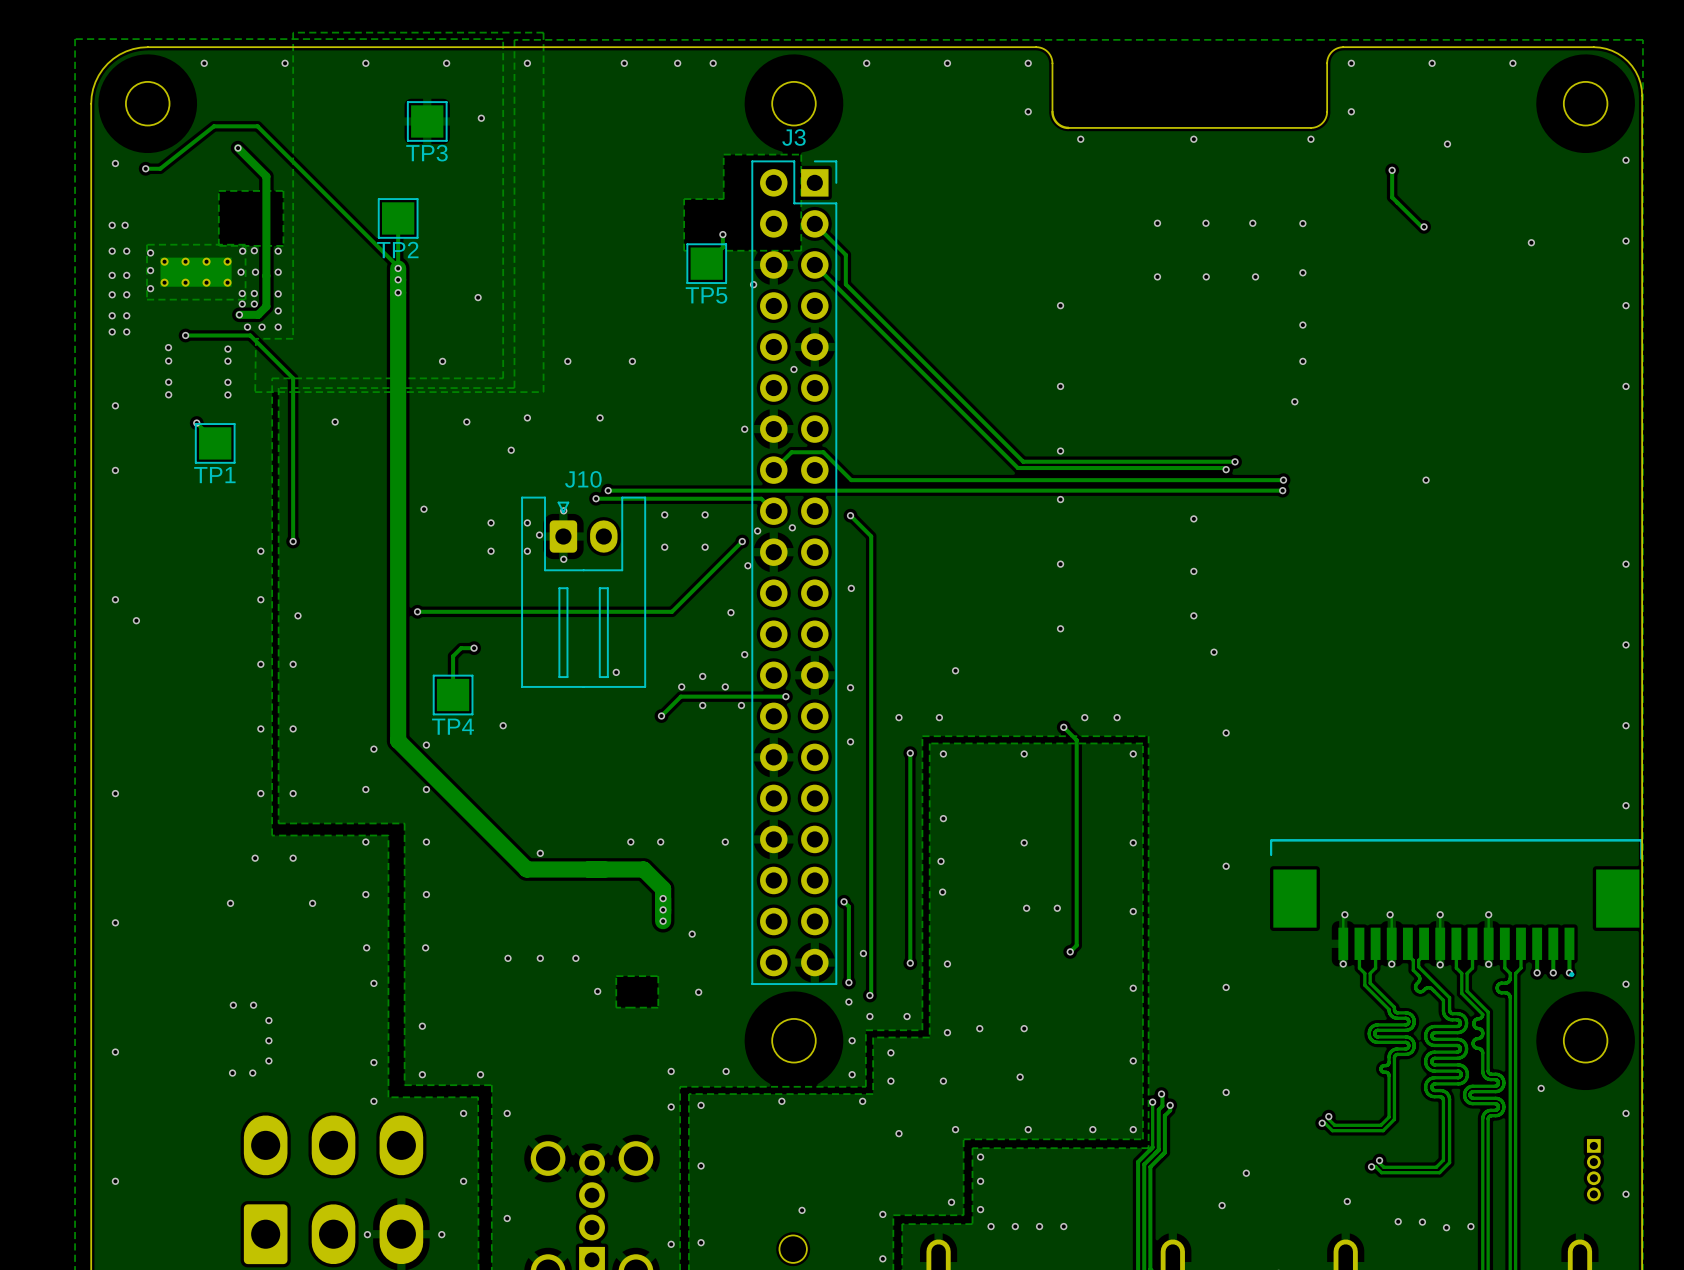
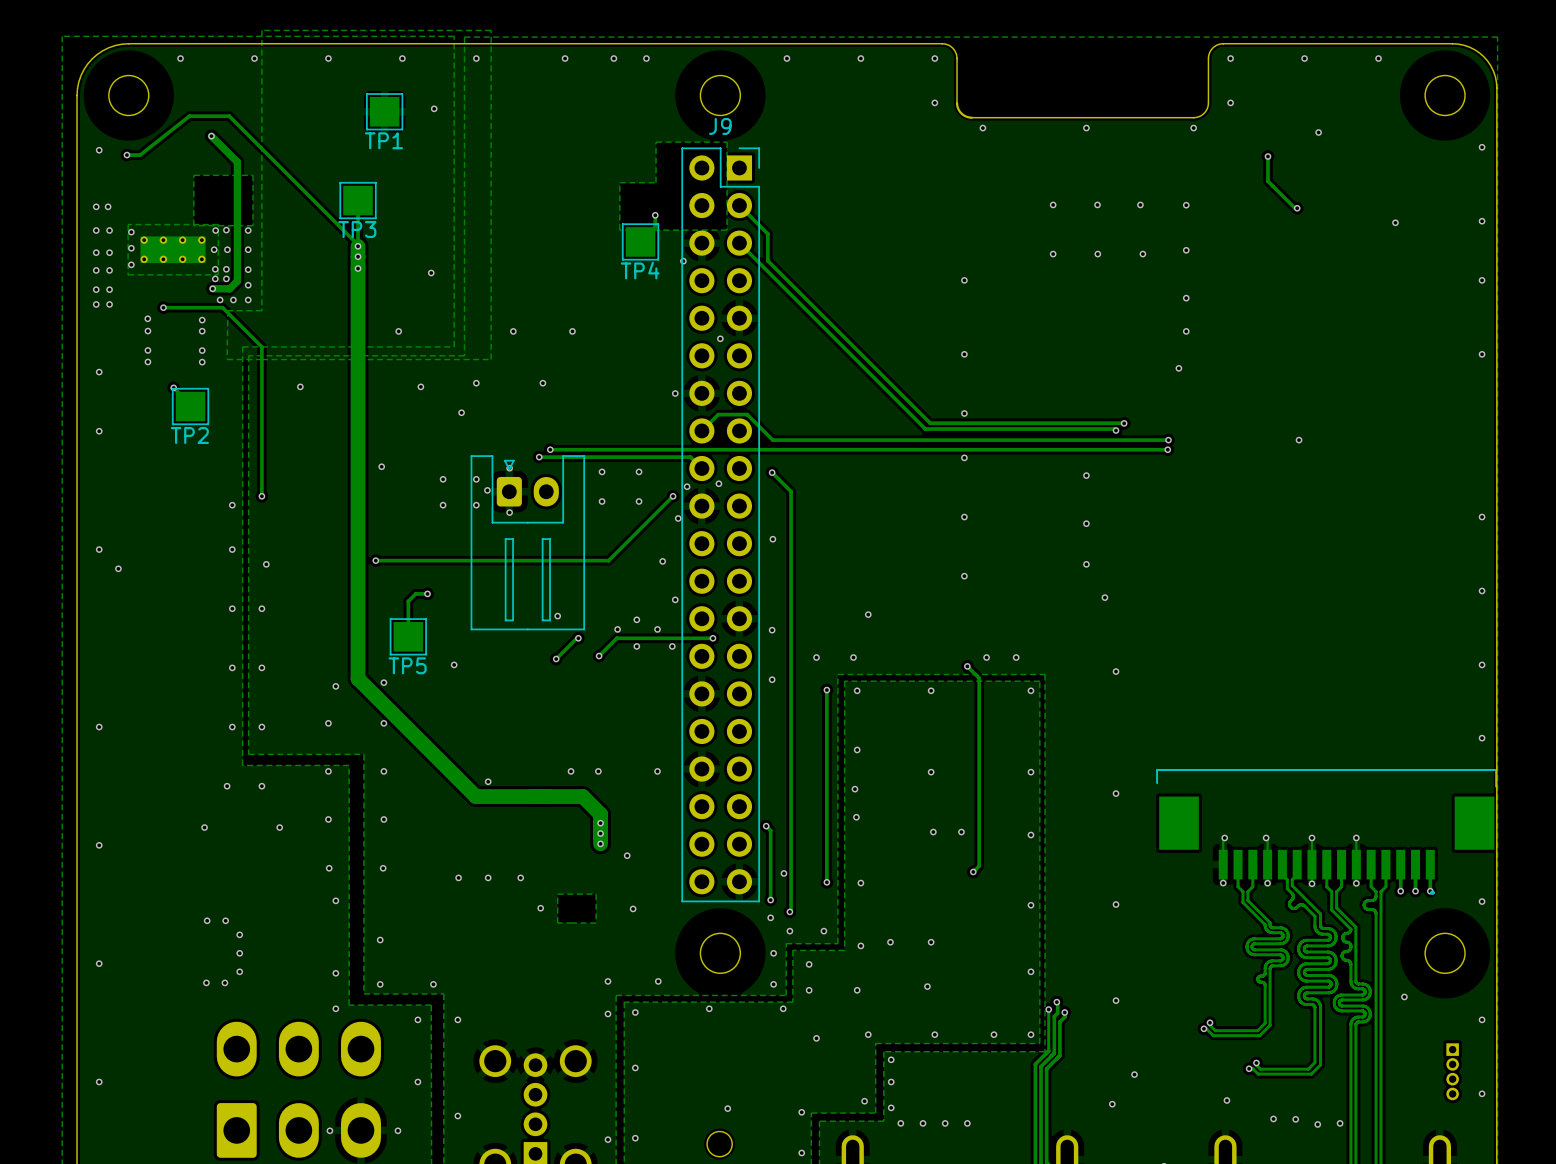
J3 name: J3 (793, 137) -> J9 (720, 126)
TP3 name: TP3 (426, 153) -> TP1 (383, 140)
TP2 name: TP2 (397, 250) -> TP3 (357, 229)
TP5 name: TP5 (706, 295) -> TP4 (640, 270)
TP1 name: TP1 (214, 475) -> TP2 (189, 435)
J10 name: J10 (583, 479) -> none
track: none -> (578, 638) (556, 659)
via: none -> (578, 638)
via: none -> (556, 659)
TP4 name: TP4 (453, 726) -> TP5 (407, 665)

